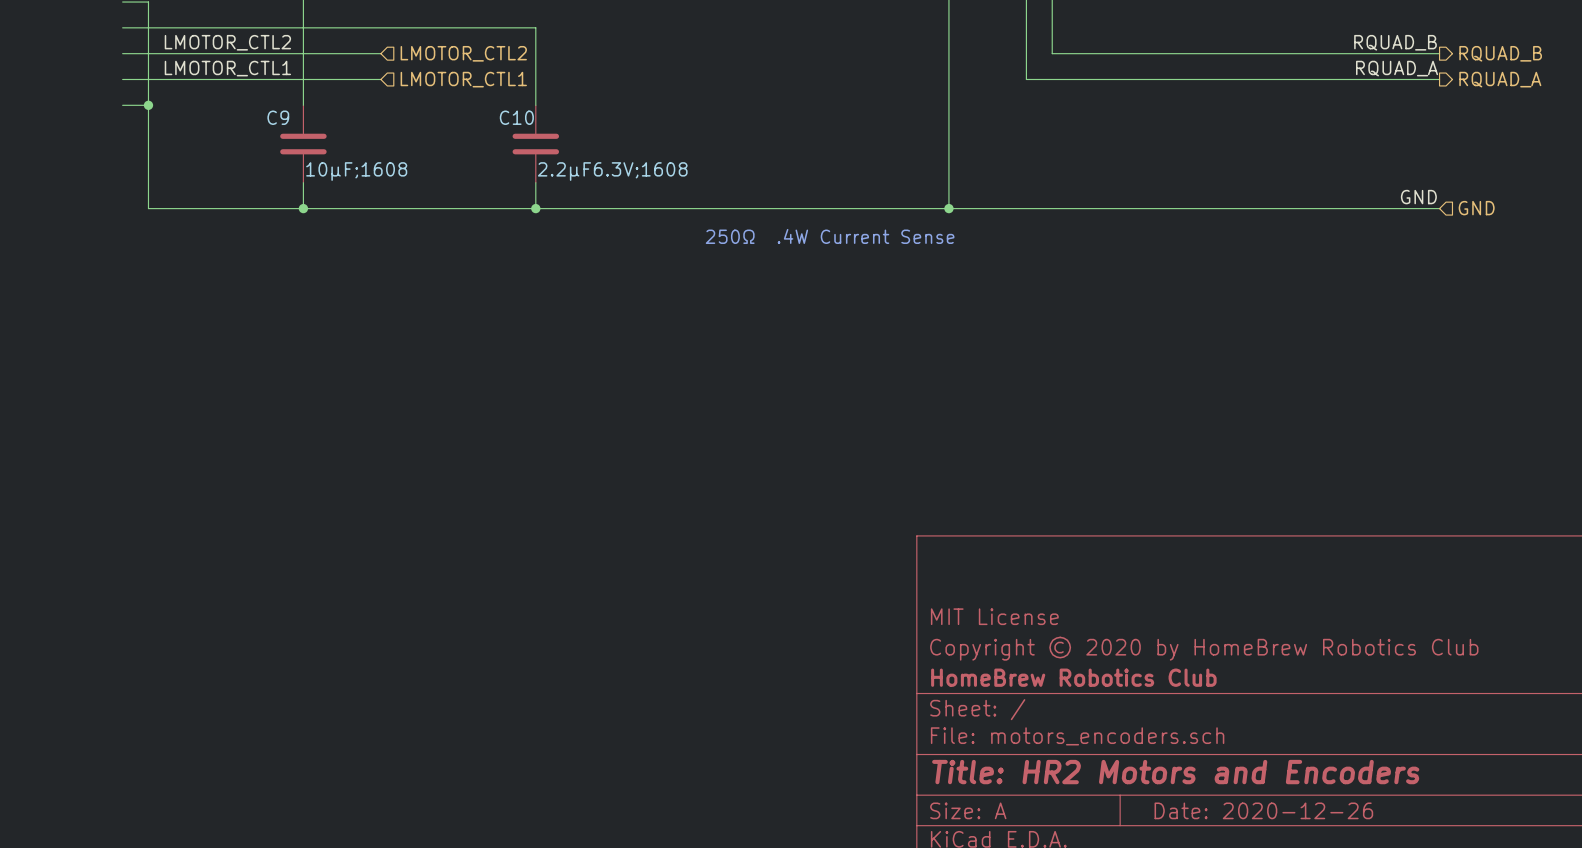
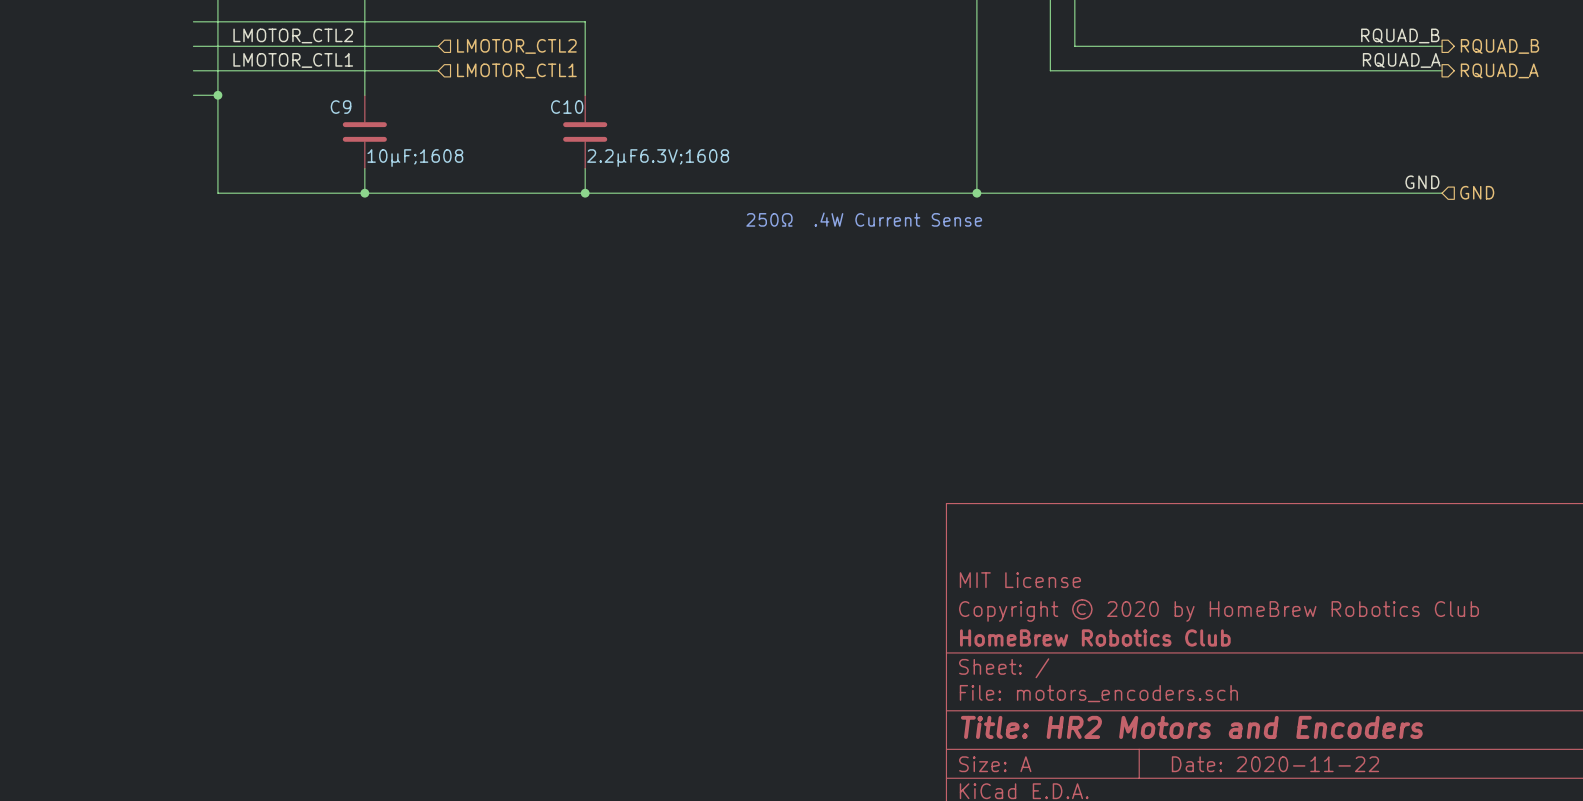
title block: Date: 2020-12-26 (1263, 810) -> Date: 2020-11-22 (1275, 764)

